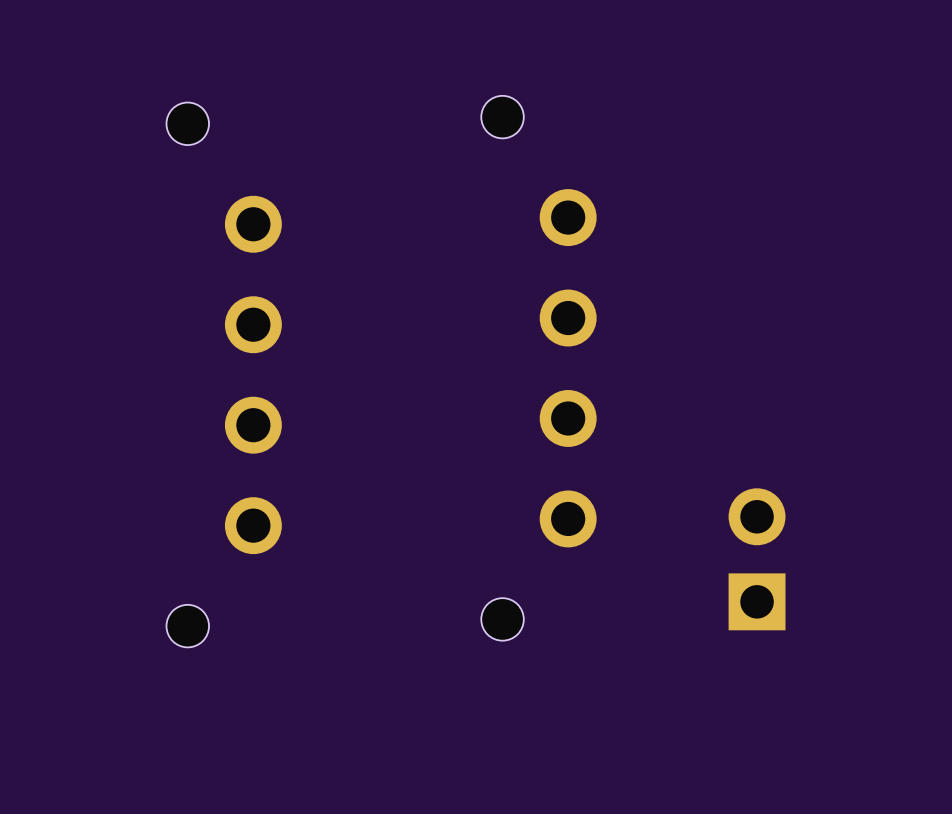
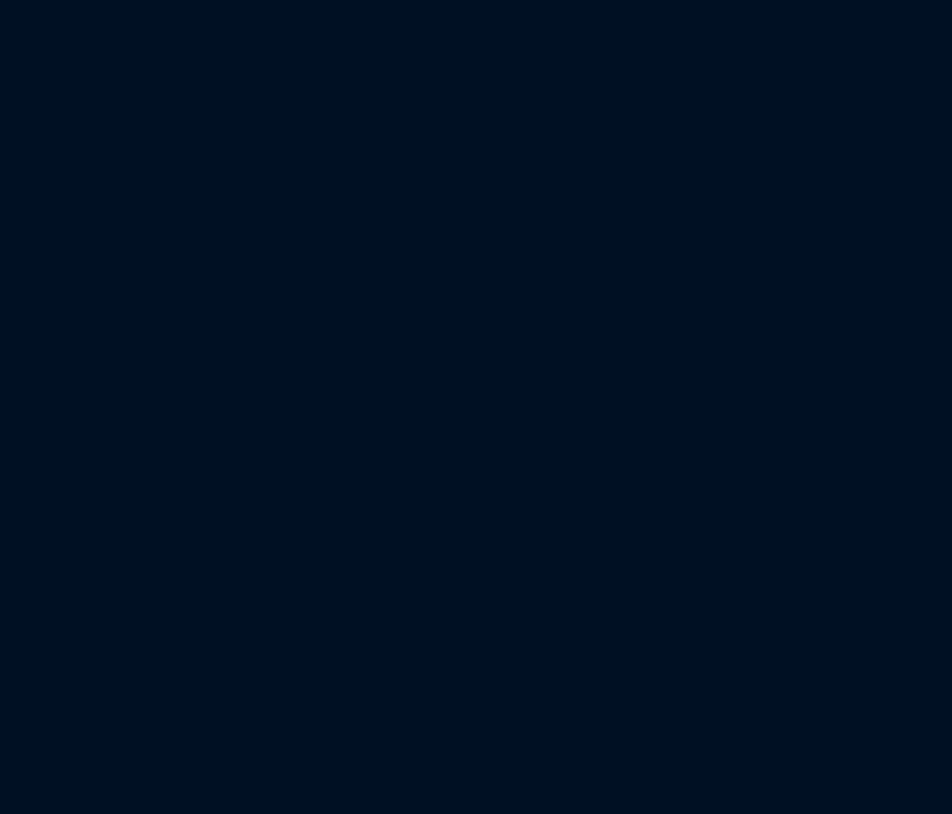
part: (538, 368) -> none
part: (224, 374) -> none
part: (757, 559) -> none

